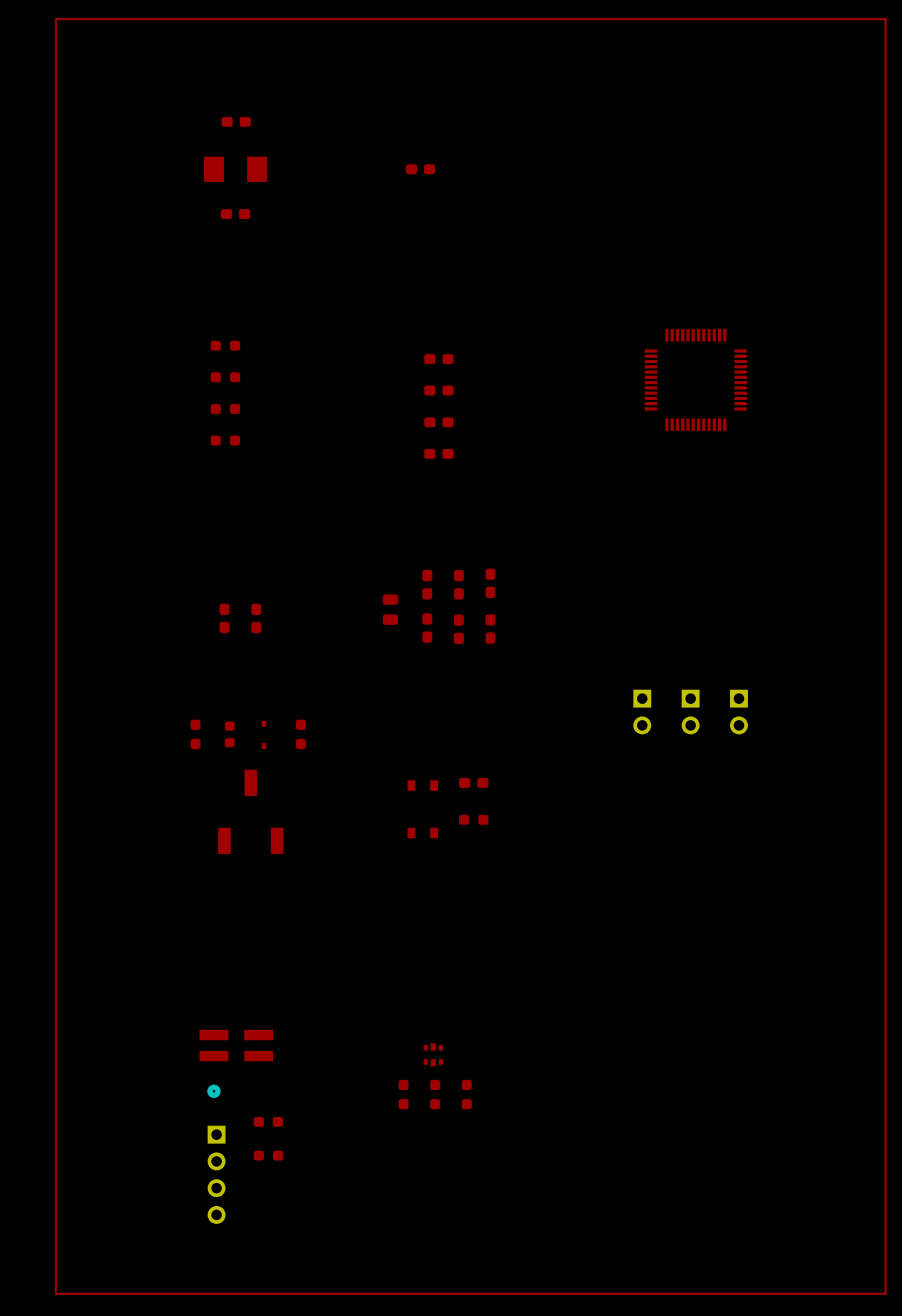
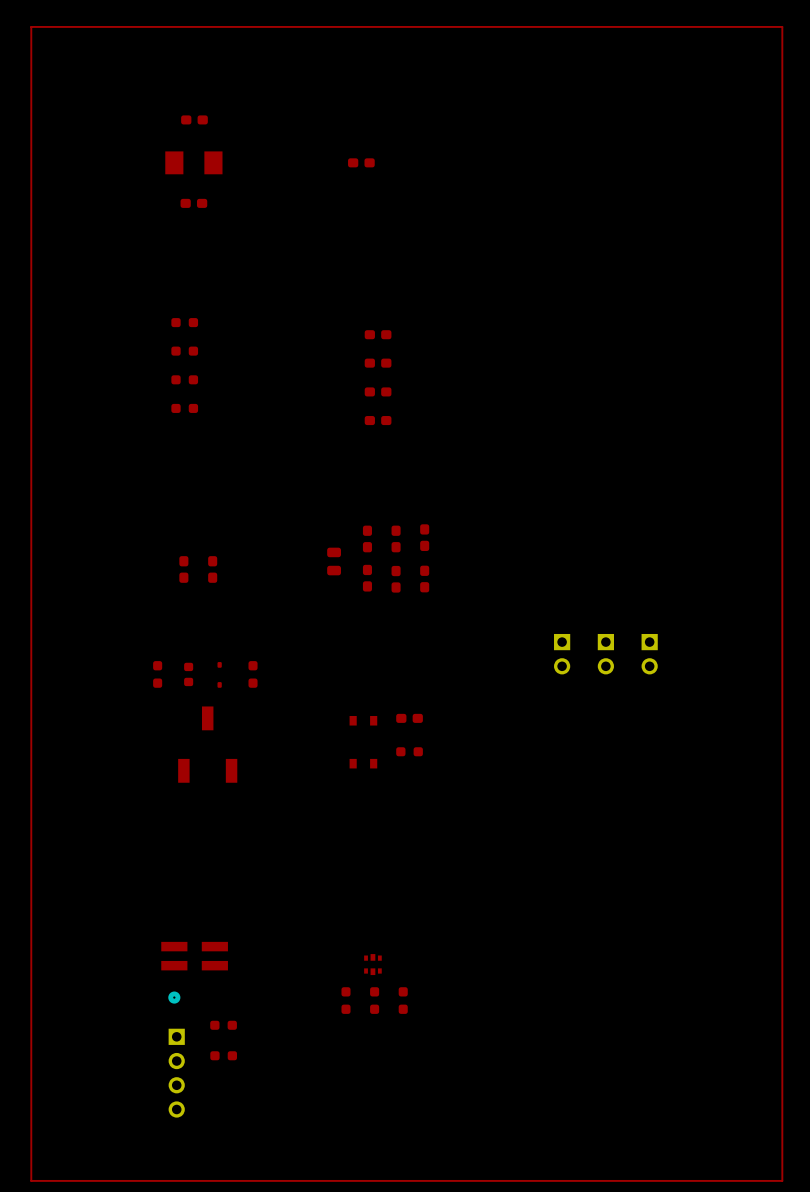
part: (695, 379) -> none

